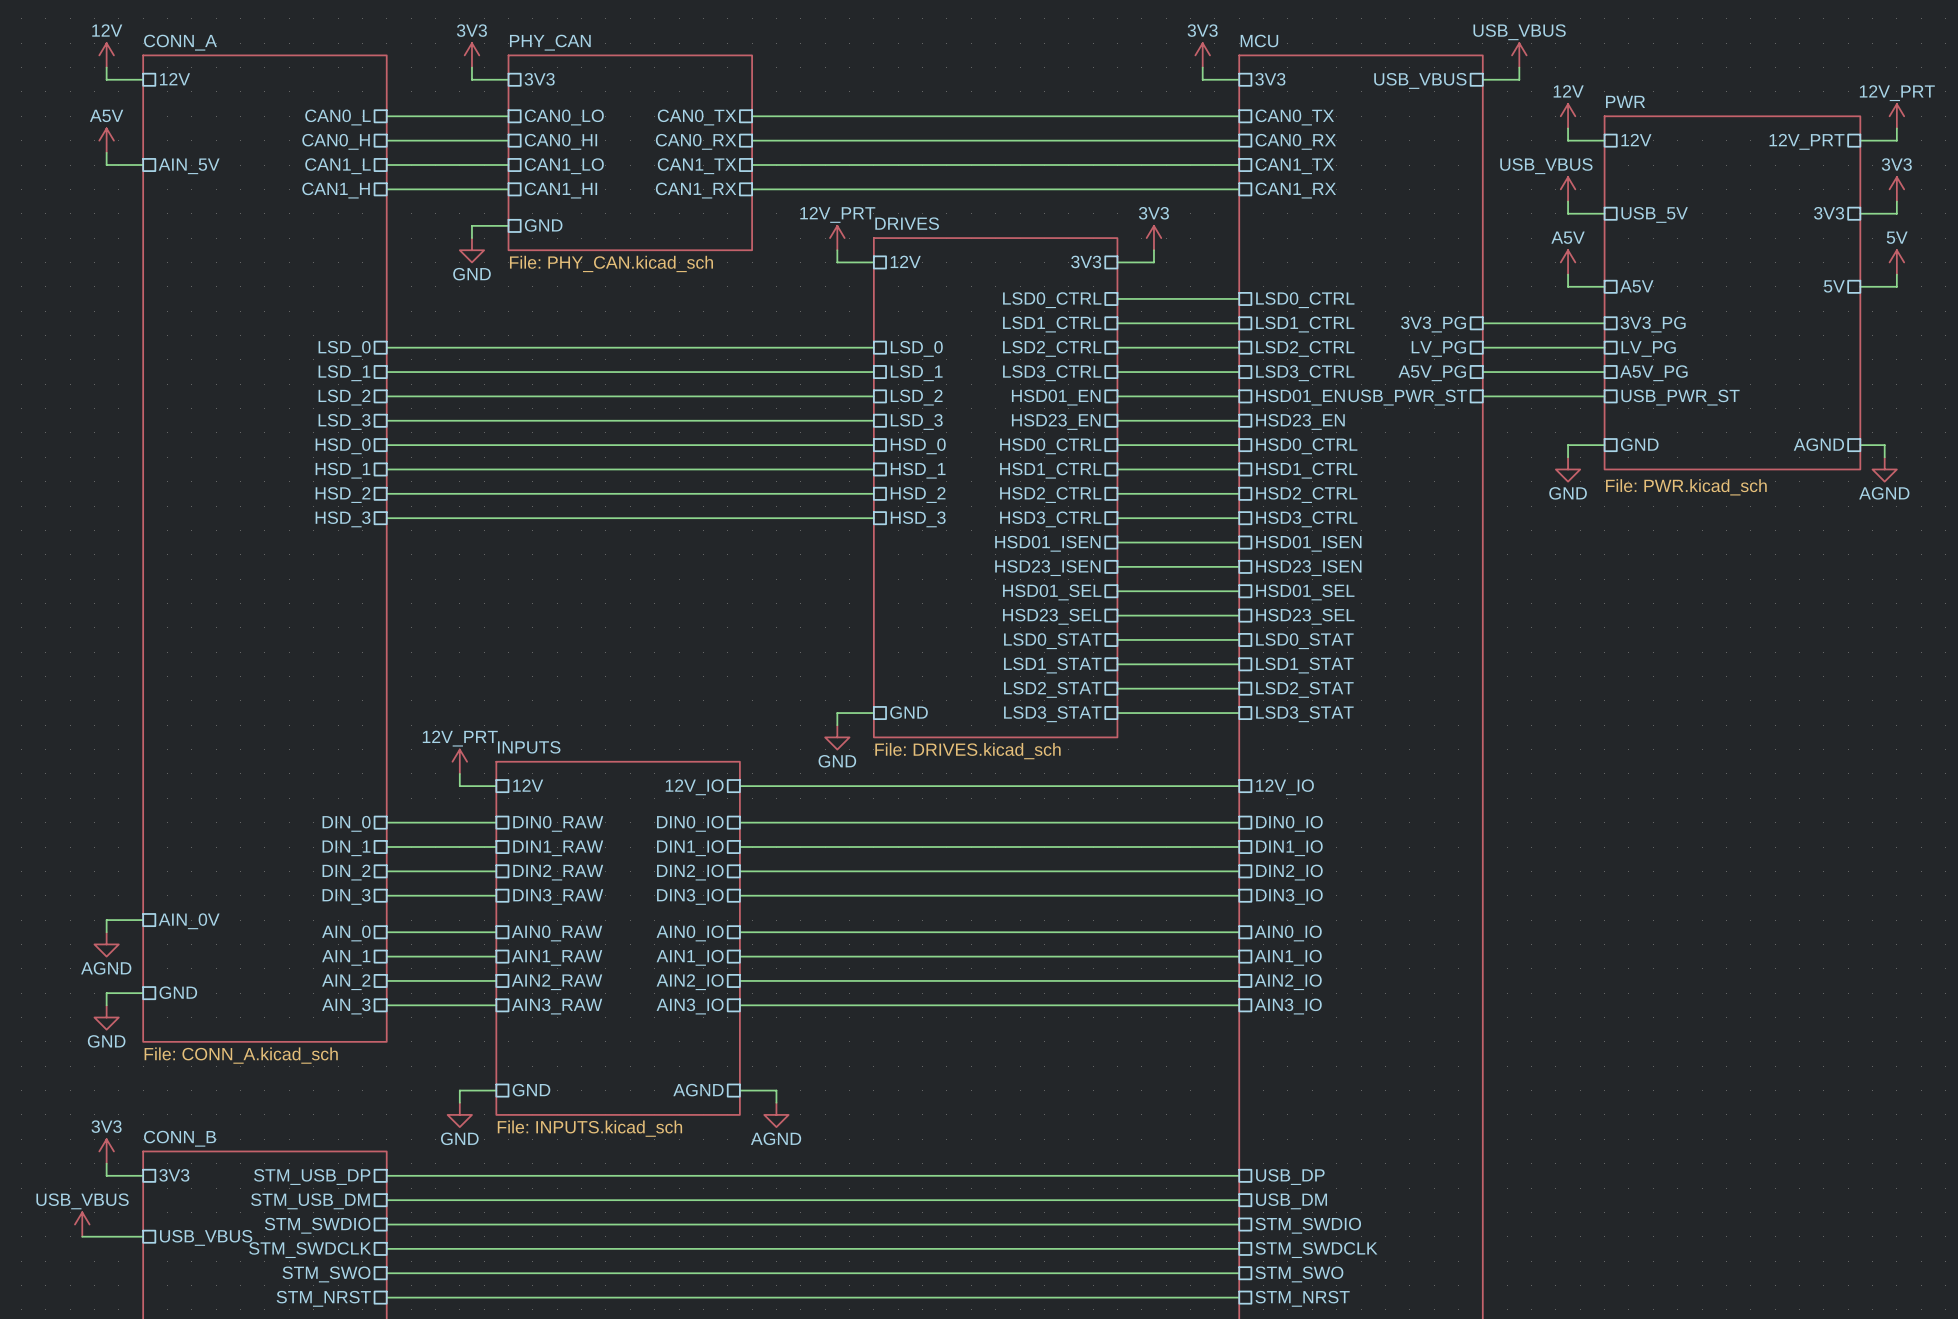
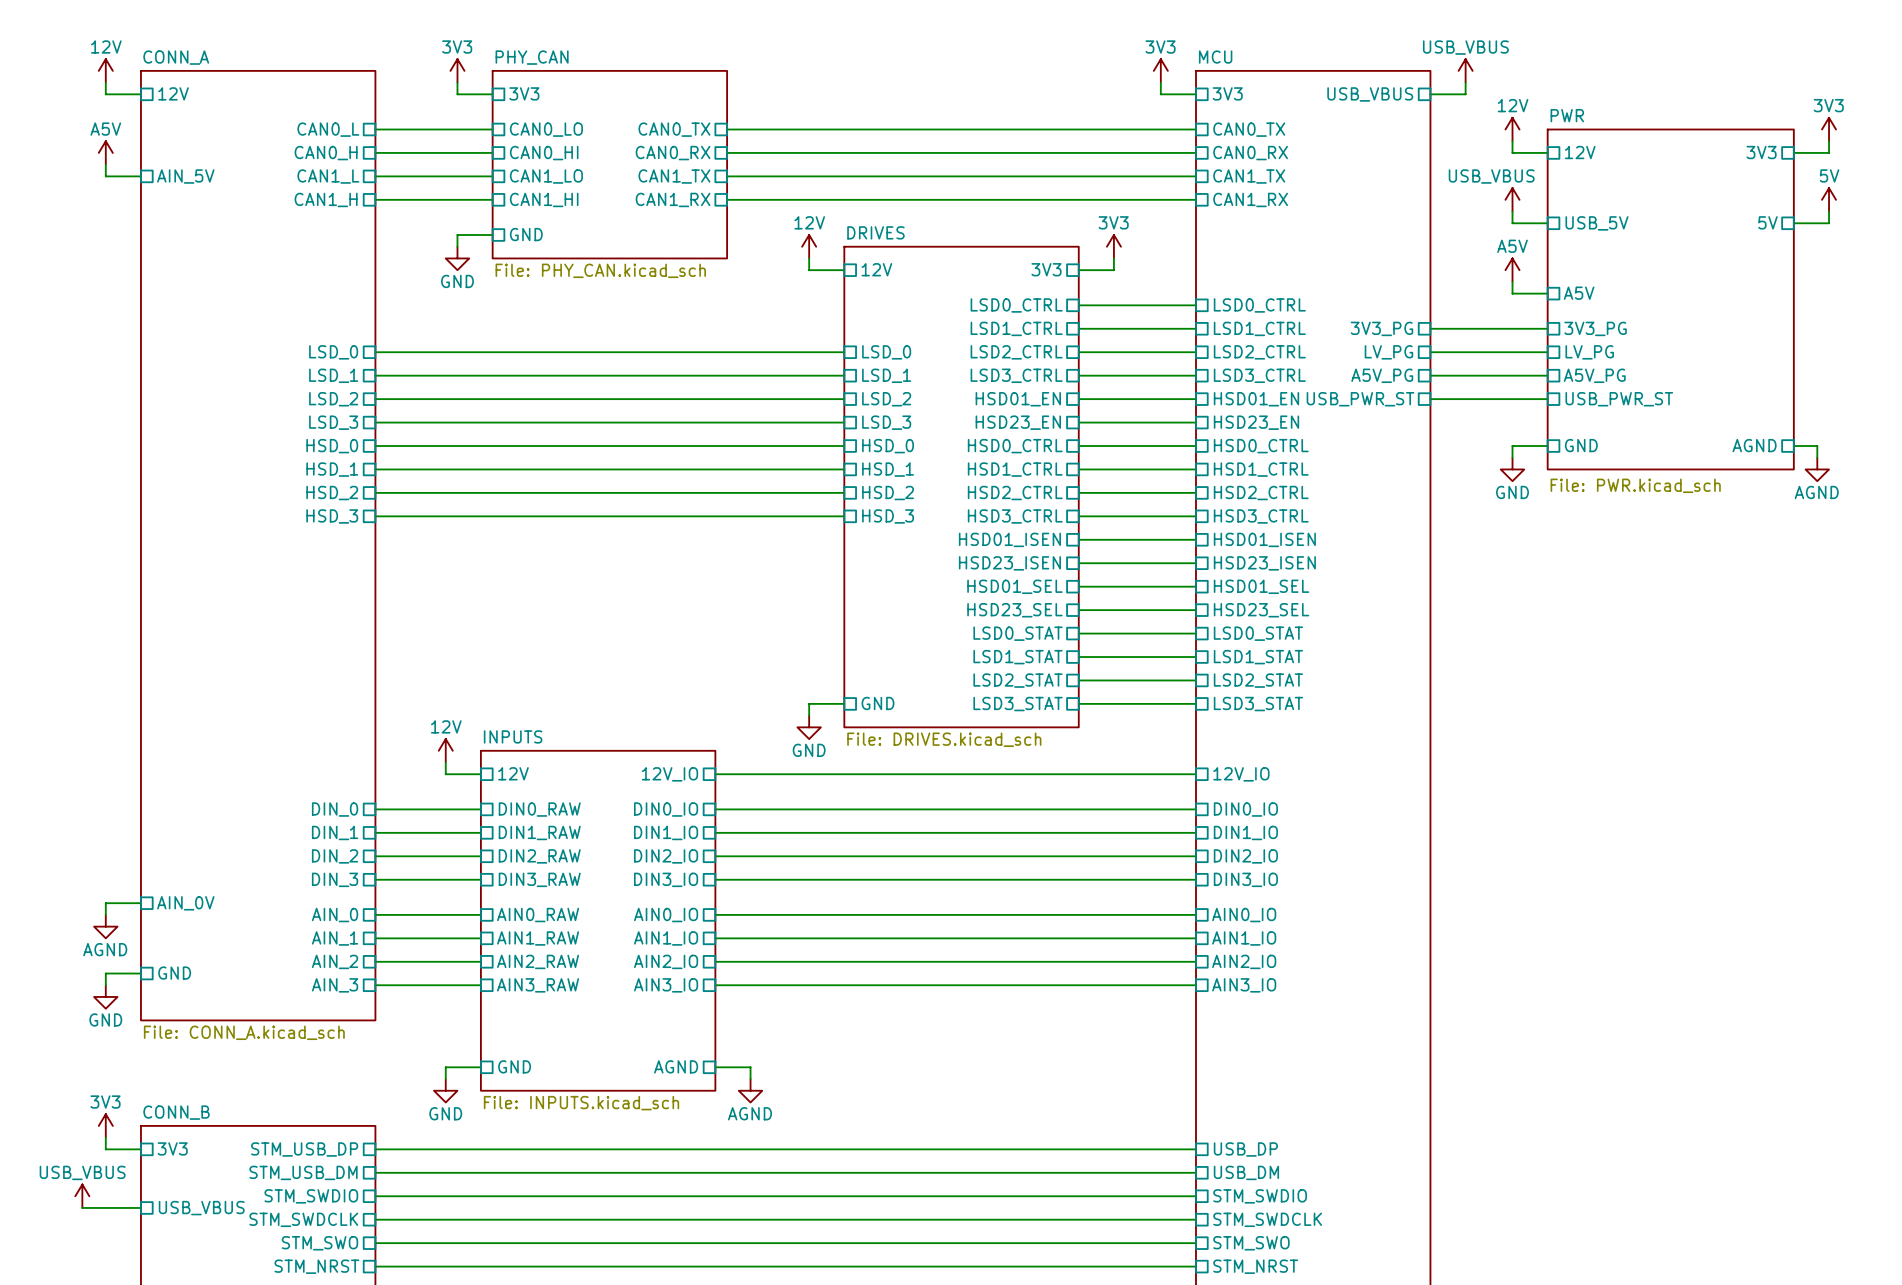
power symbol: 12V_PRT (1896, 116) -> 3V3 (1829, 129)
sheet pin: 12V_PRT (1806, 141) -> 3V3 (1761, 152)
power symbol: 3V3 (1896, 189) -> 5V (1829, 199)
sheet pin: 3V3 (1829, 213) -> 5V (1767, 222)
power symbol: 12V_PRT (837, 238) -> 12V (809, 246)
power symbol: 5V (1896, 262) -> none
wire: (1896, 274) (1896, 286) (1860, 286) -> none
sheet pin: 5V (1834, 286) -> none
power symbol: 12V_PRT (459, 761) -> 12V (445, 750)

